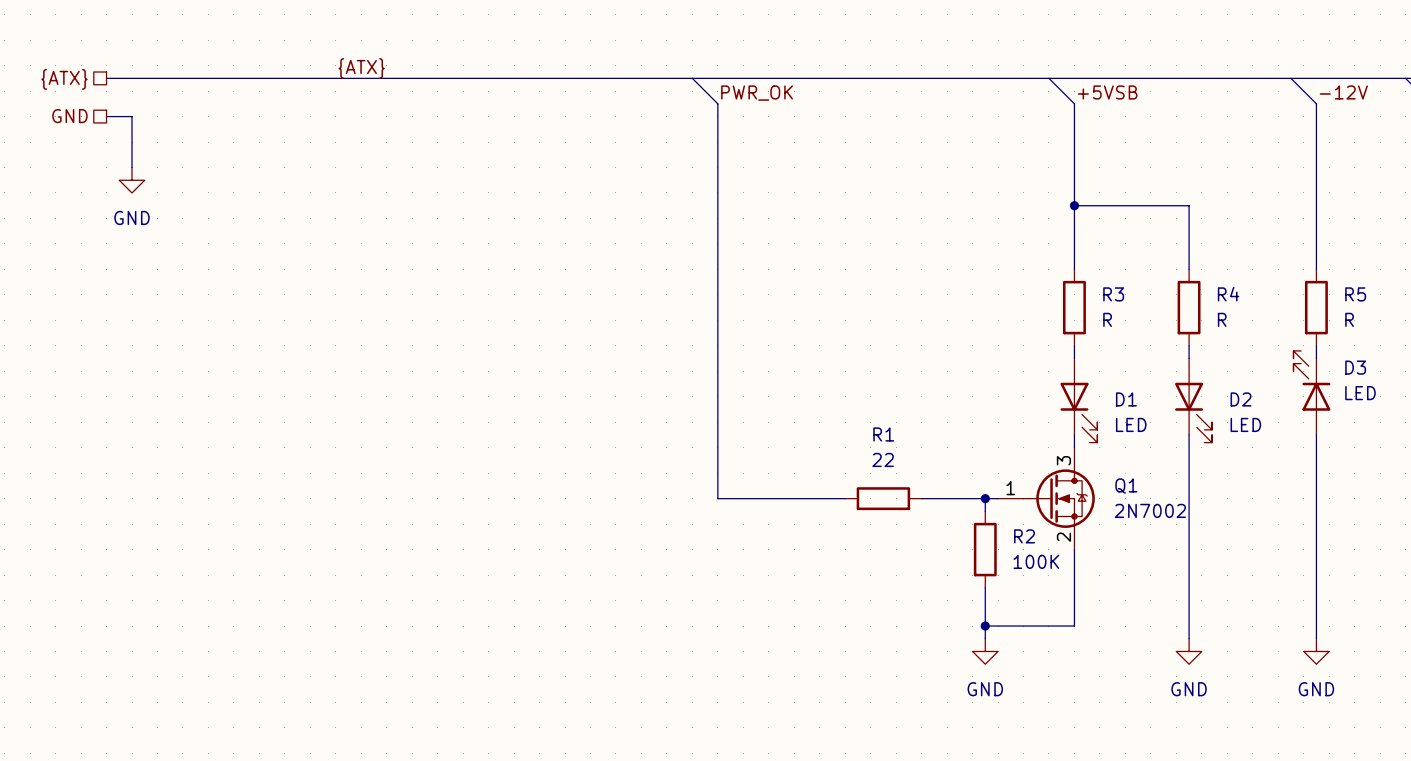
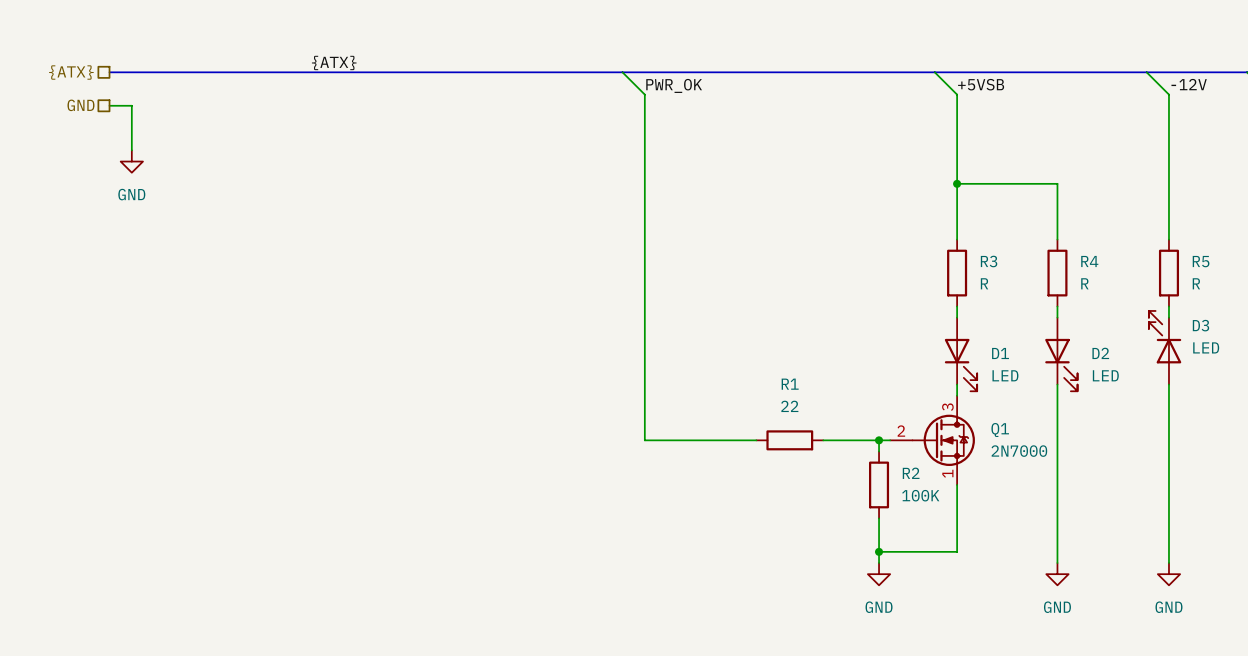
Q1 pin number: 1 (1010, 488) -> 2 (901, 431)
Q1 value: 2N7002 (1150, 510) -> 2N7000 (1019, 451)
Q1 pin number: 2 (1063, 537) -> 1 (947, 473)

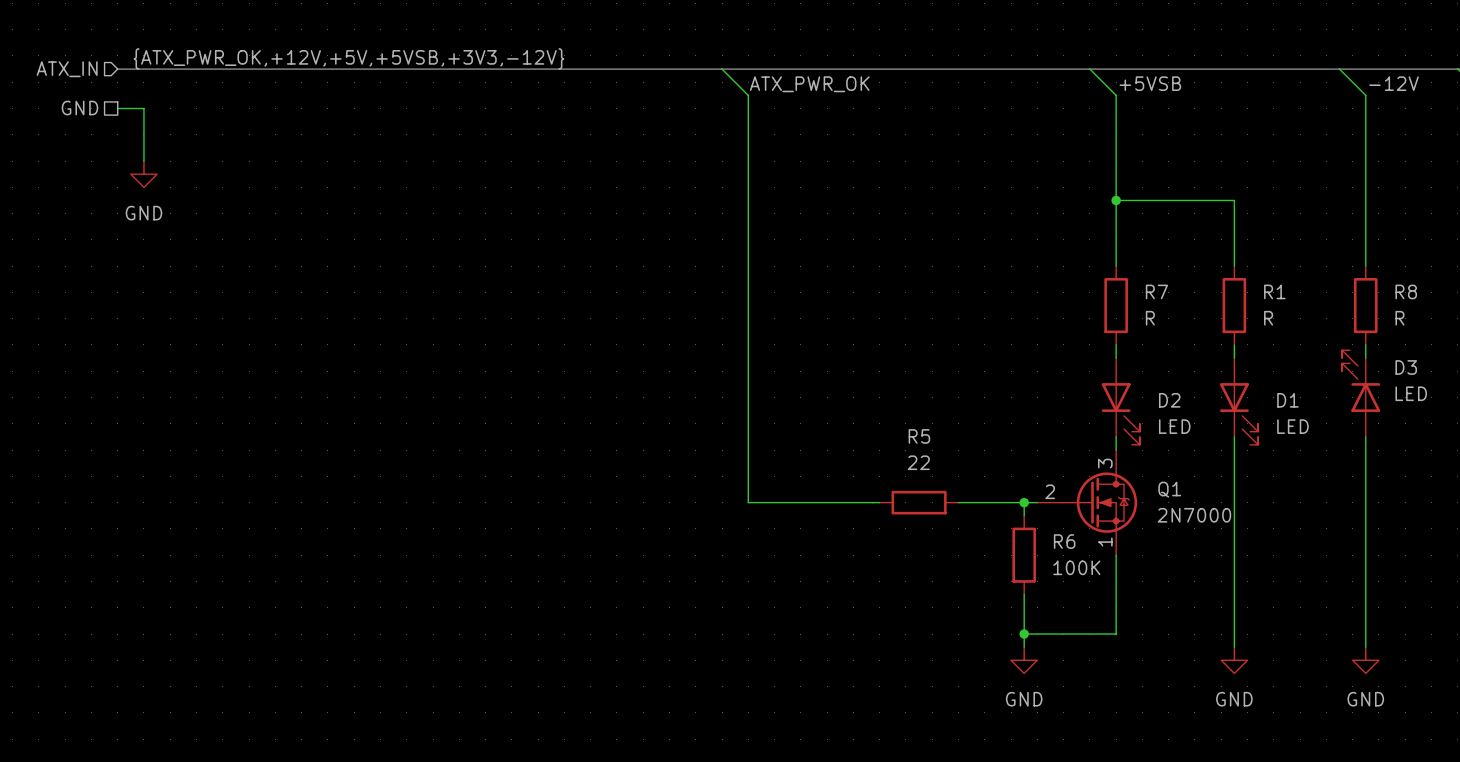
label: {ATX} (334, 62) -> none
label: none -> {ATX_PWR_OK,+12V,+5V,+5VSB,+3V3,-12V} (348, 58)
hierarchical label shape: passive (71, 72) -> input (67, 69)
hierarchical label: {ATX} (71, 72) -> ATX_IN (67, 69)
label: PWR_OK (674, 85) -> ATX_PWR_OK (809, 84)
R3 name: R3 (989, 261) -> R7 (1156, 291)
R4 name: R4 (1089, 261) -> R1 (1274, 291)
R5 name: R5 (1201, 261) -> R8 (1406, 291)
D1 name: D1 (1000, 353) -> D2 (1169, 400)
D2 name: D2 (1100, 353) -> D1 (1287, 400)
R1 name: R1 (790, 384) -> R5 (919, 436)
R2 name: R2 (911, 473) -> R6 (1064, 541)

